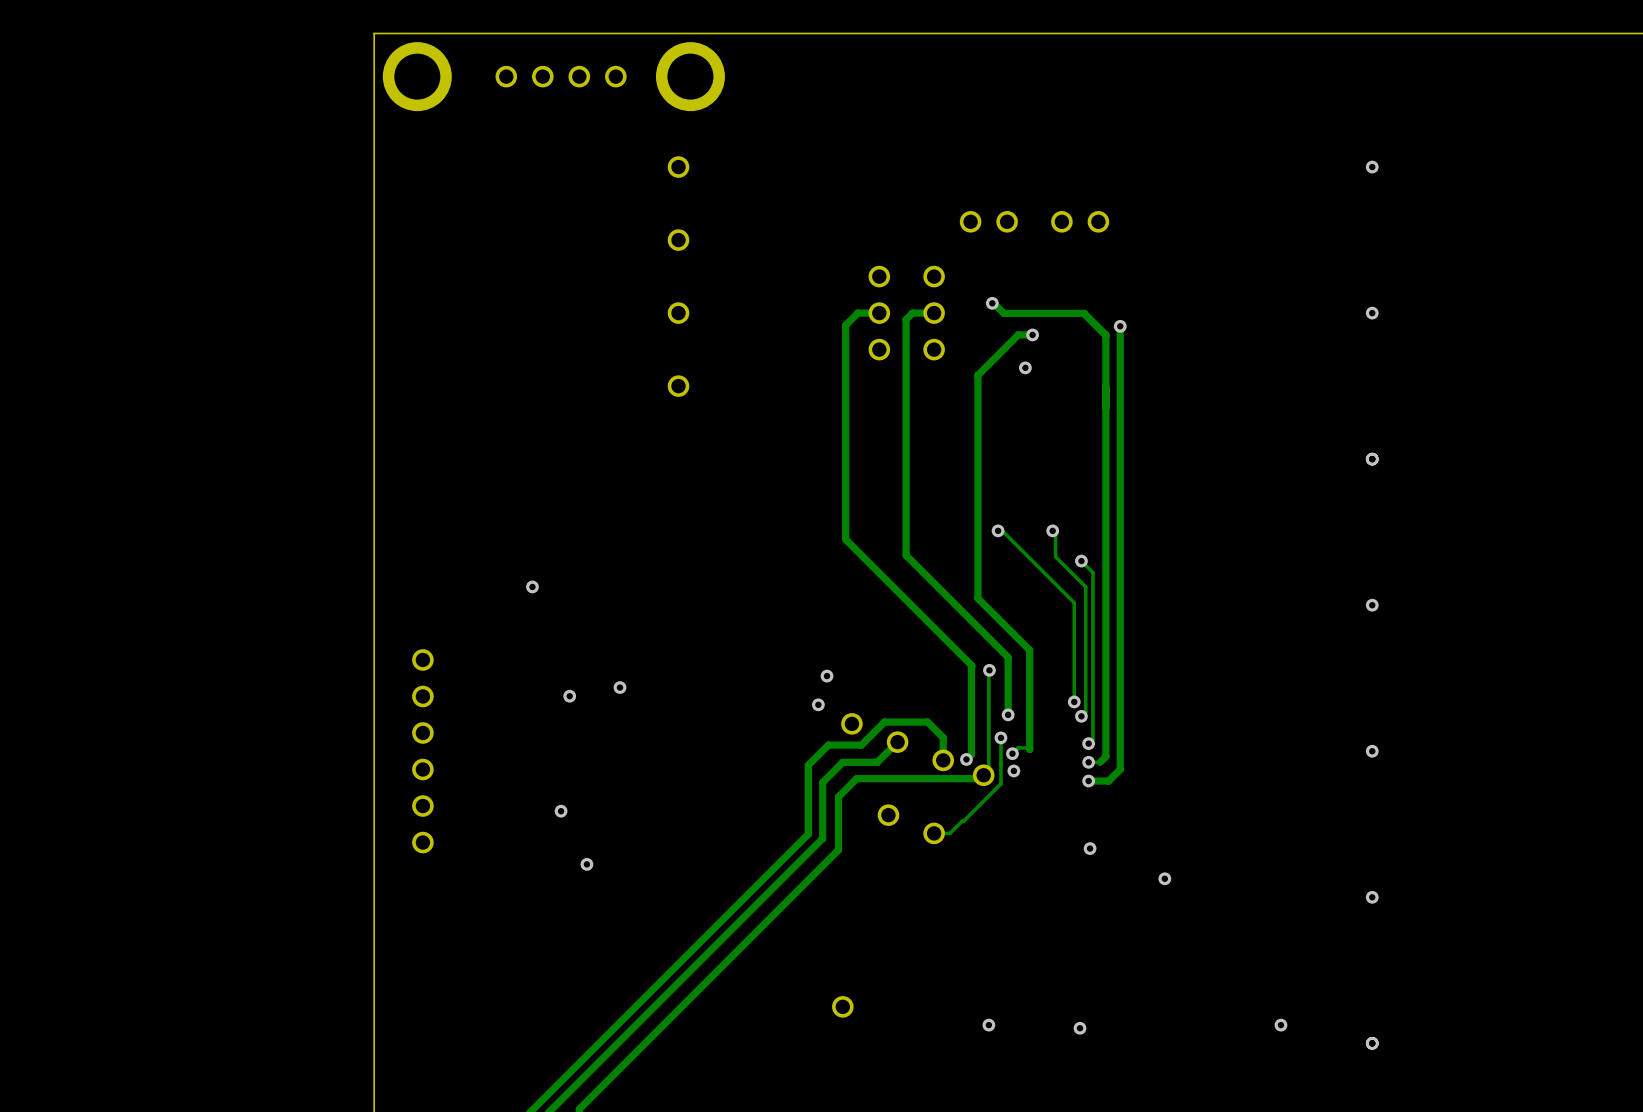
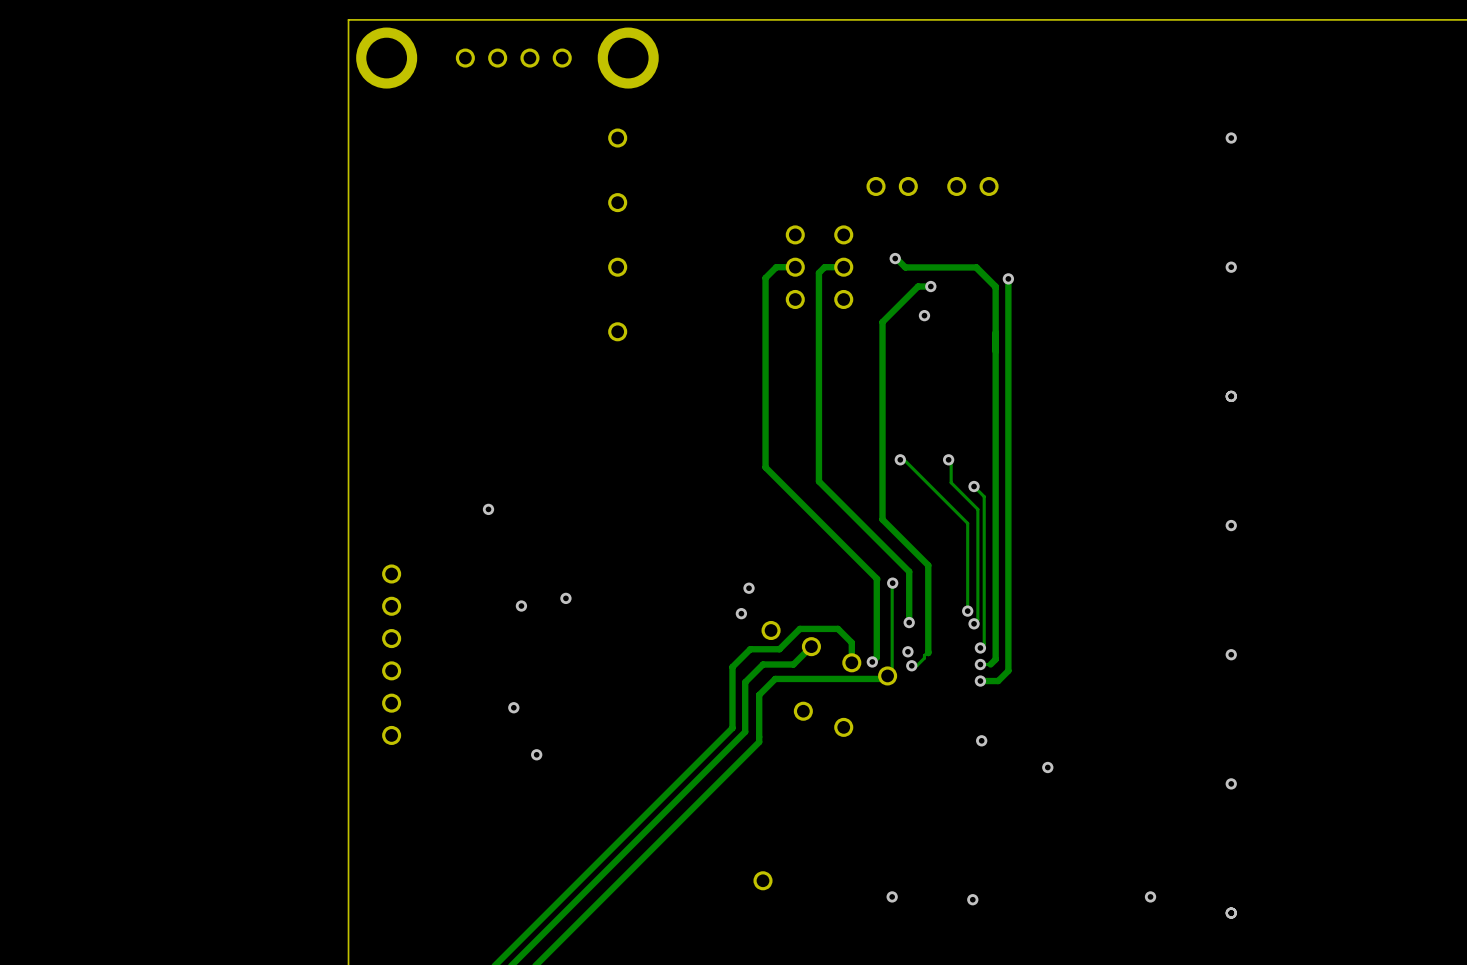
track: (1000, 737) (1000, 783) (949, 833) (934, 833) -> none
via: (1000, 737) -> none
via: none -> (907, 651)
track: (1029, 747) (1018, 747) (1012, 753) -> none
track: none -> (927, 653) (916, 665) (911, 665)
via: (1012, 753) -> none
via: none -> (911, 665)
via: (1013, 770) -> none

